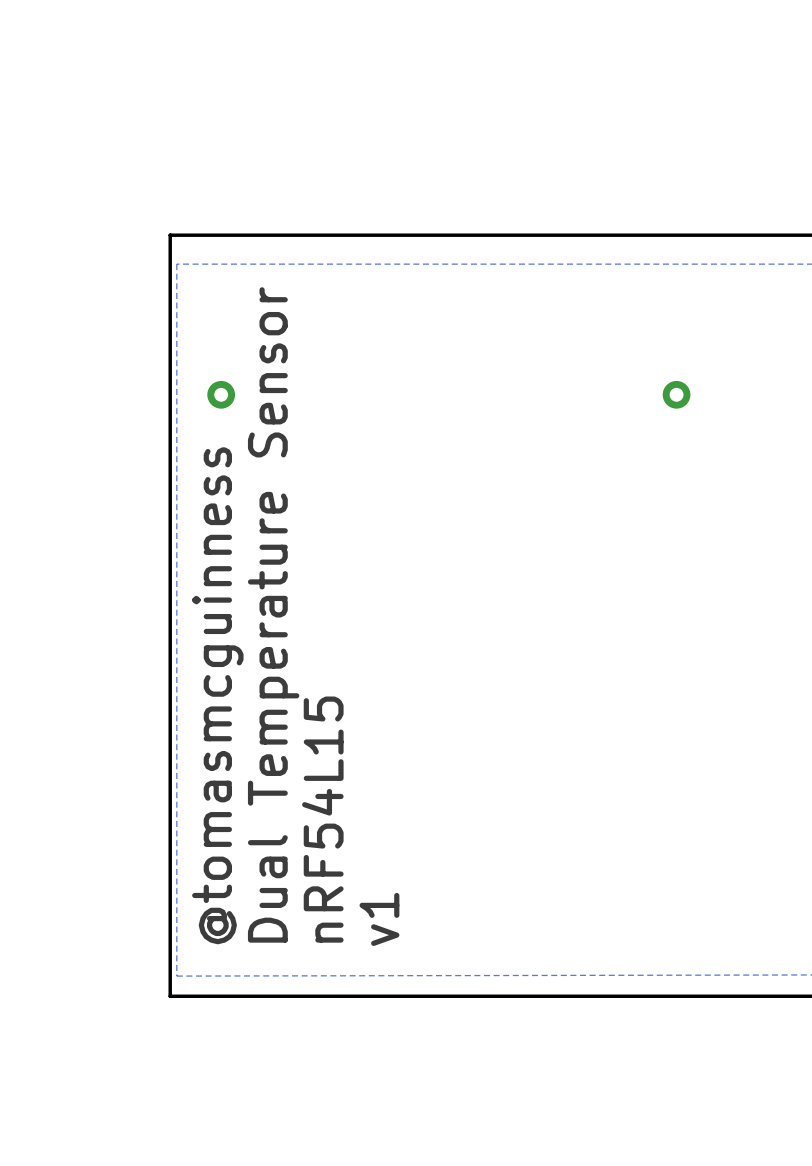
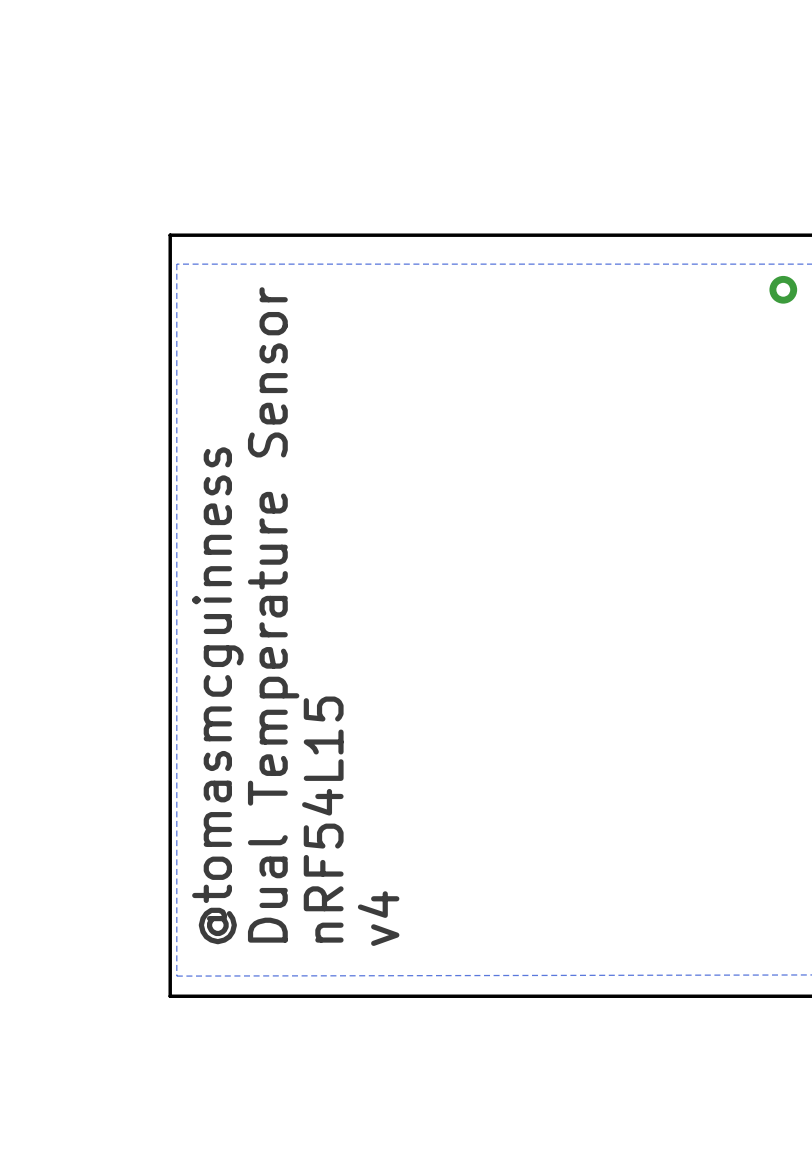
via: (221, 394) -> none
via position: (676, 394) -> (783, 289)
text: v1 (379, 919) -> v4 (378, 918)

